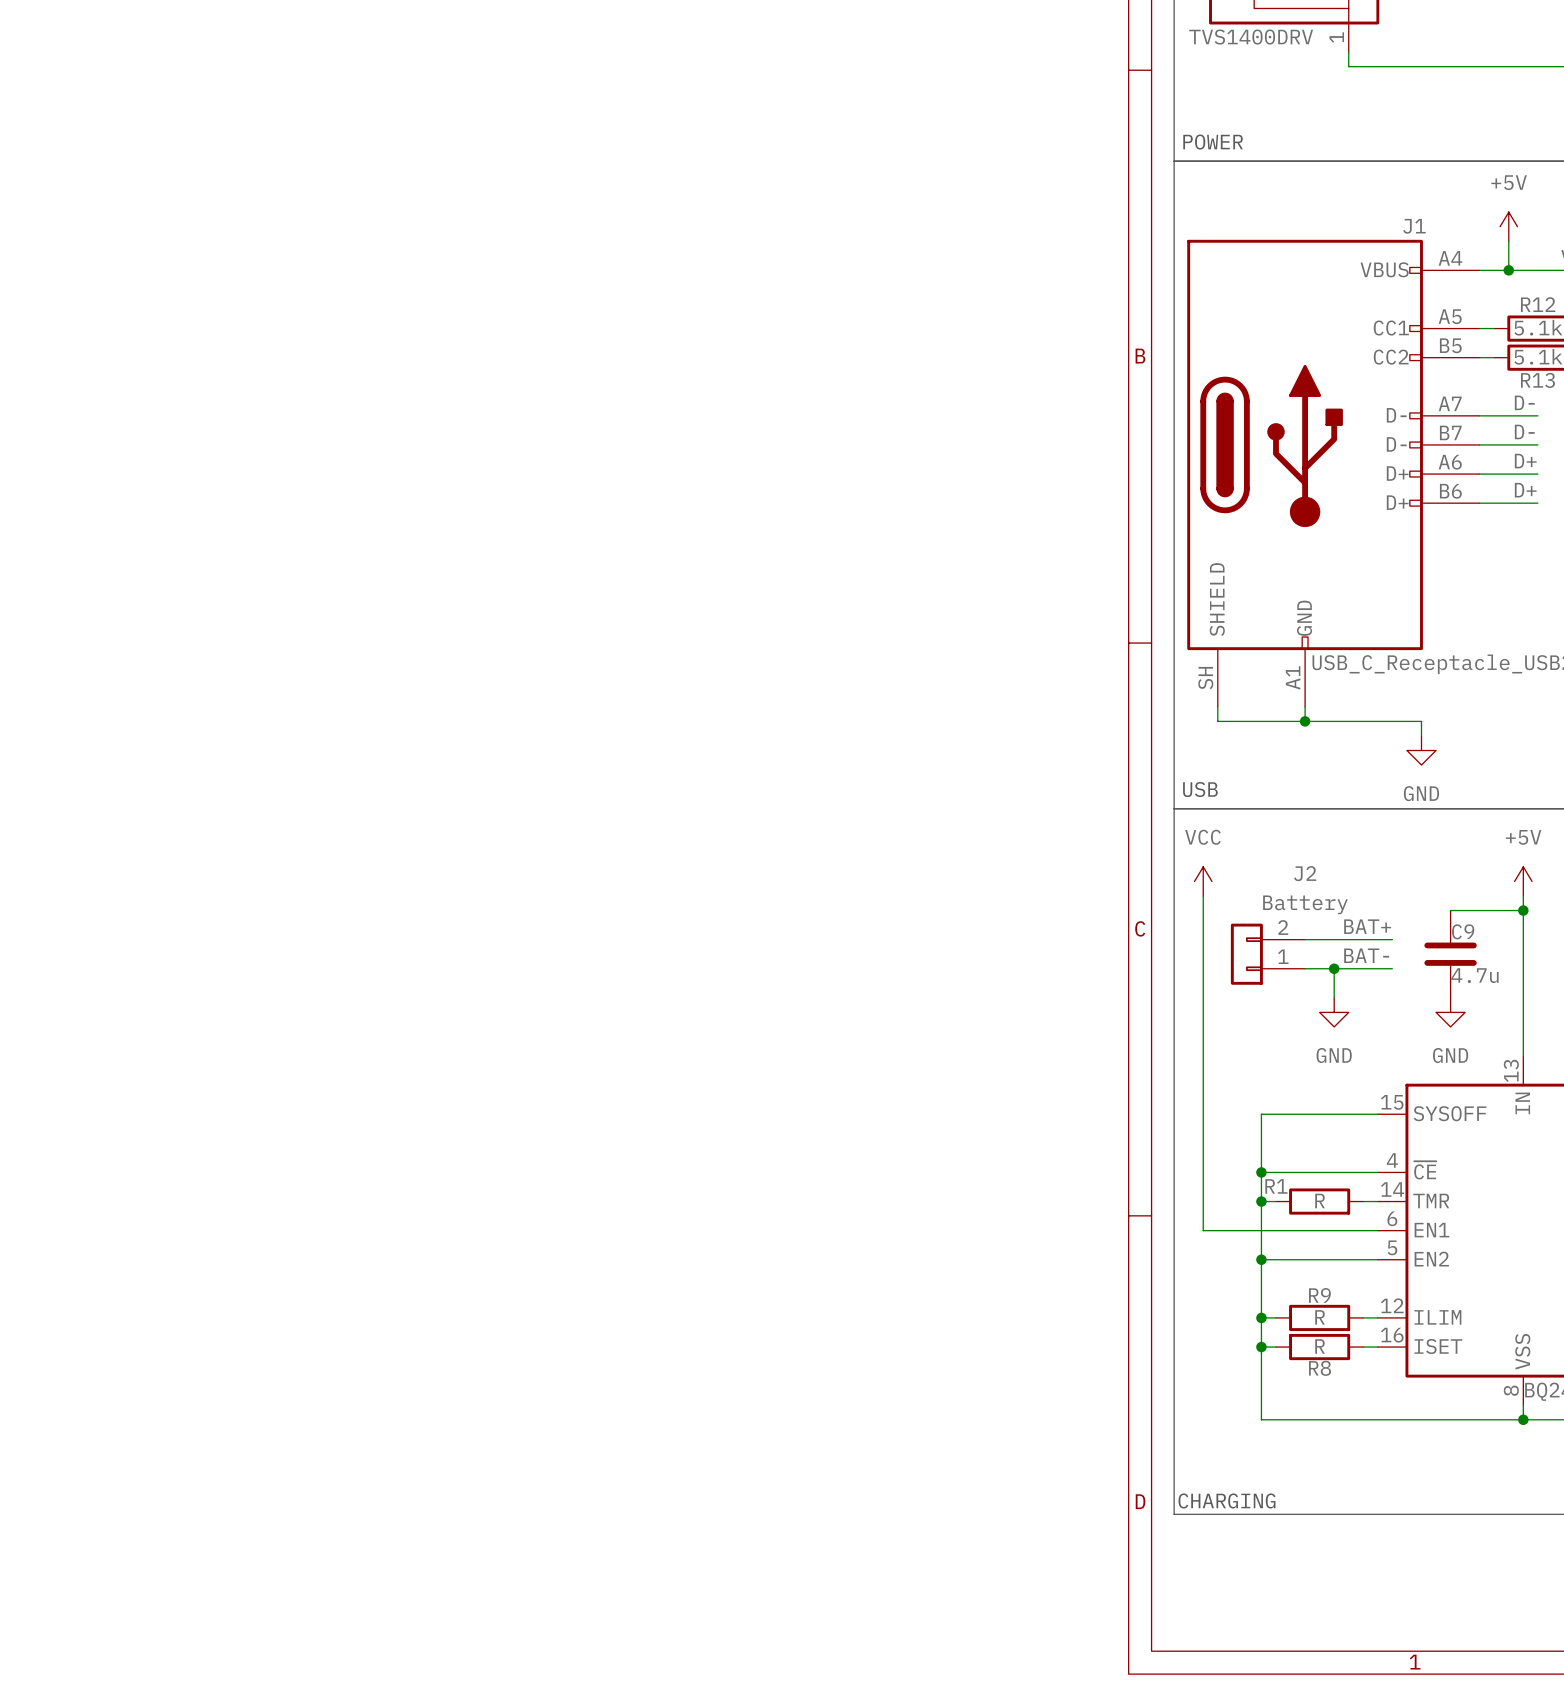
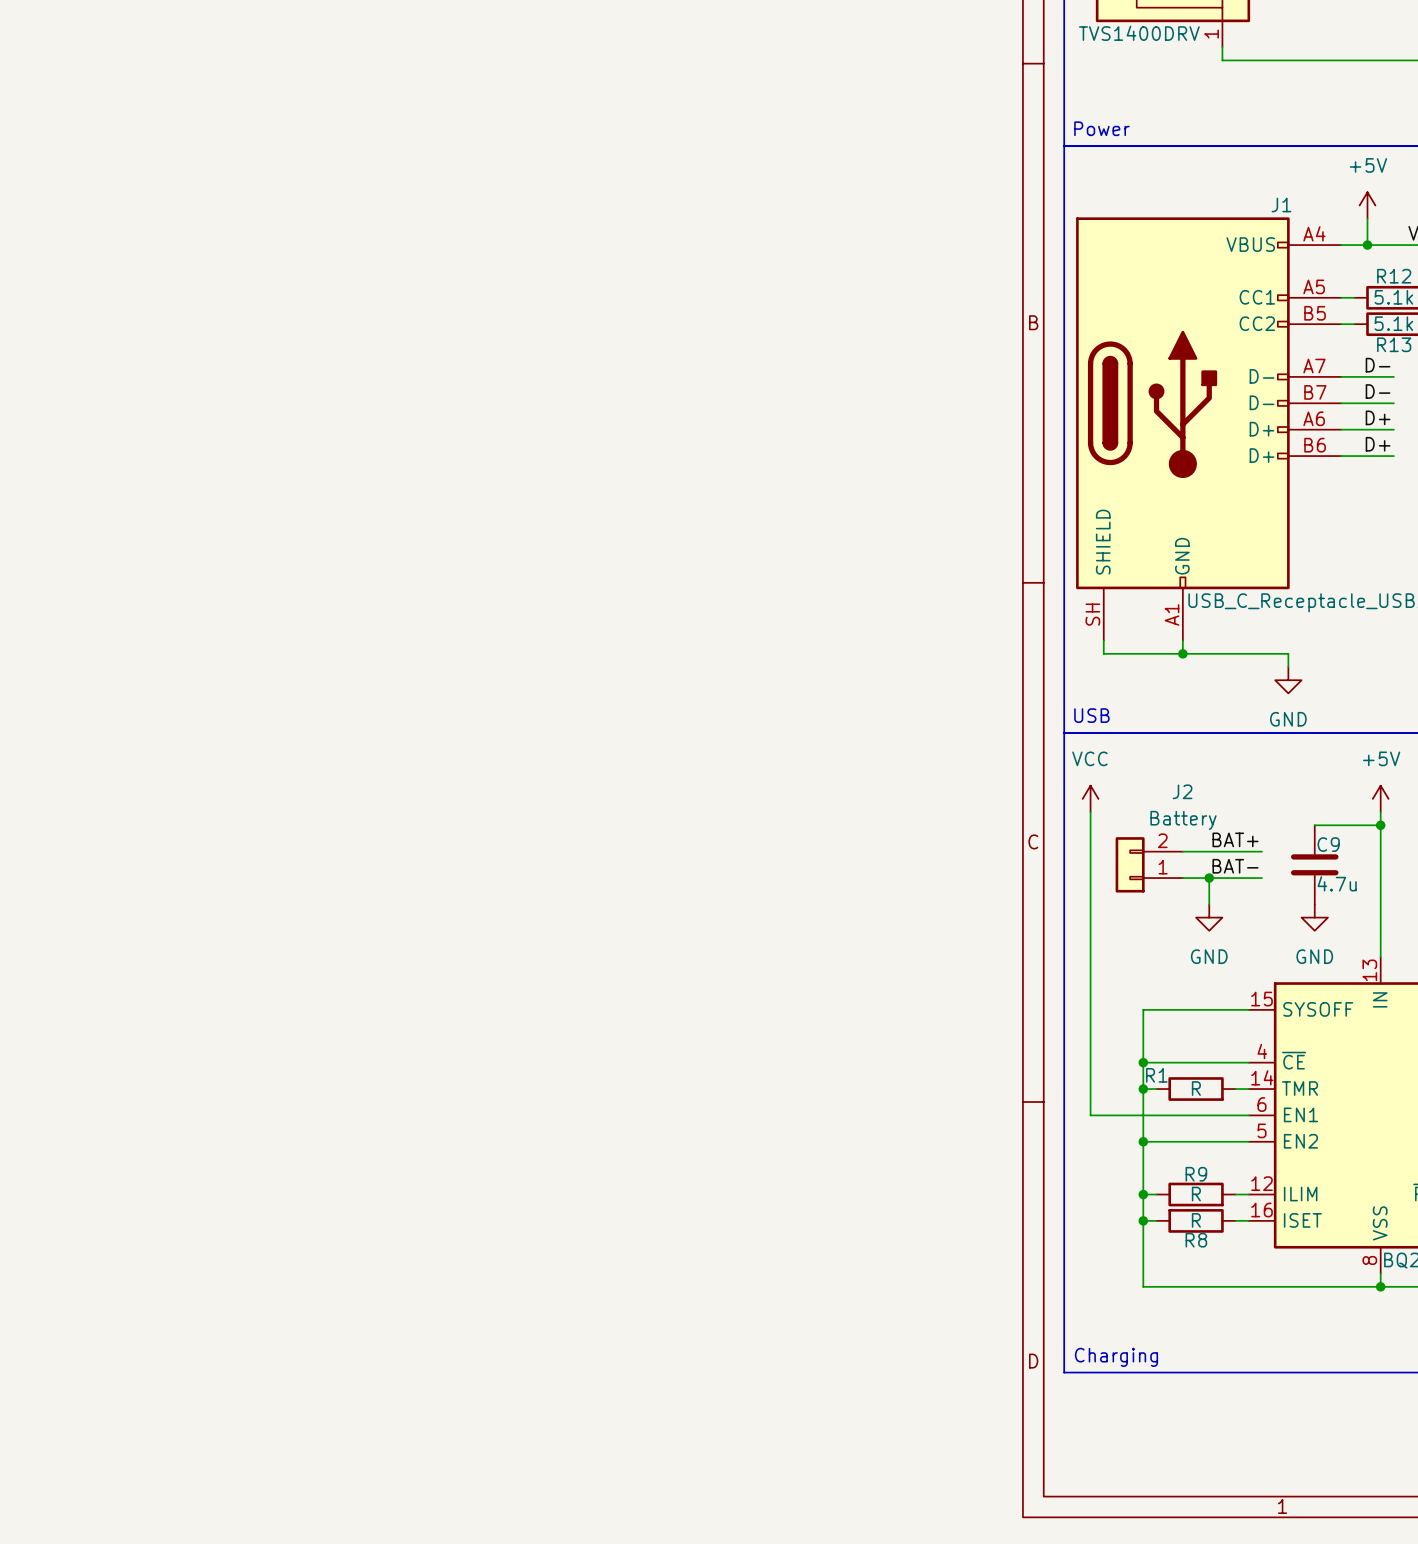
text: POWER (1213, 142) -> Power (1101, 128)
text: CHARGING (1227, 1500) -> Charging (1116, 1357)

